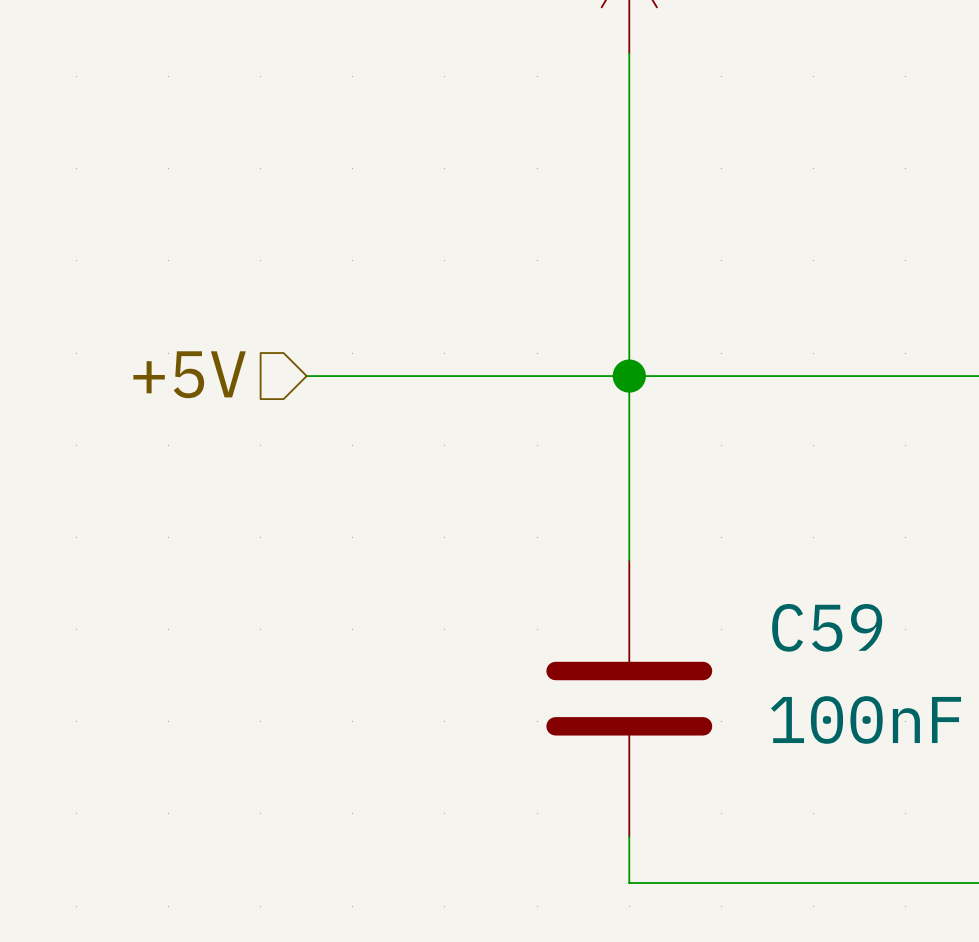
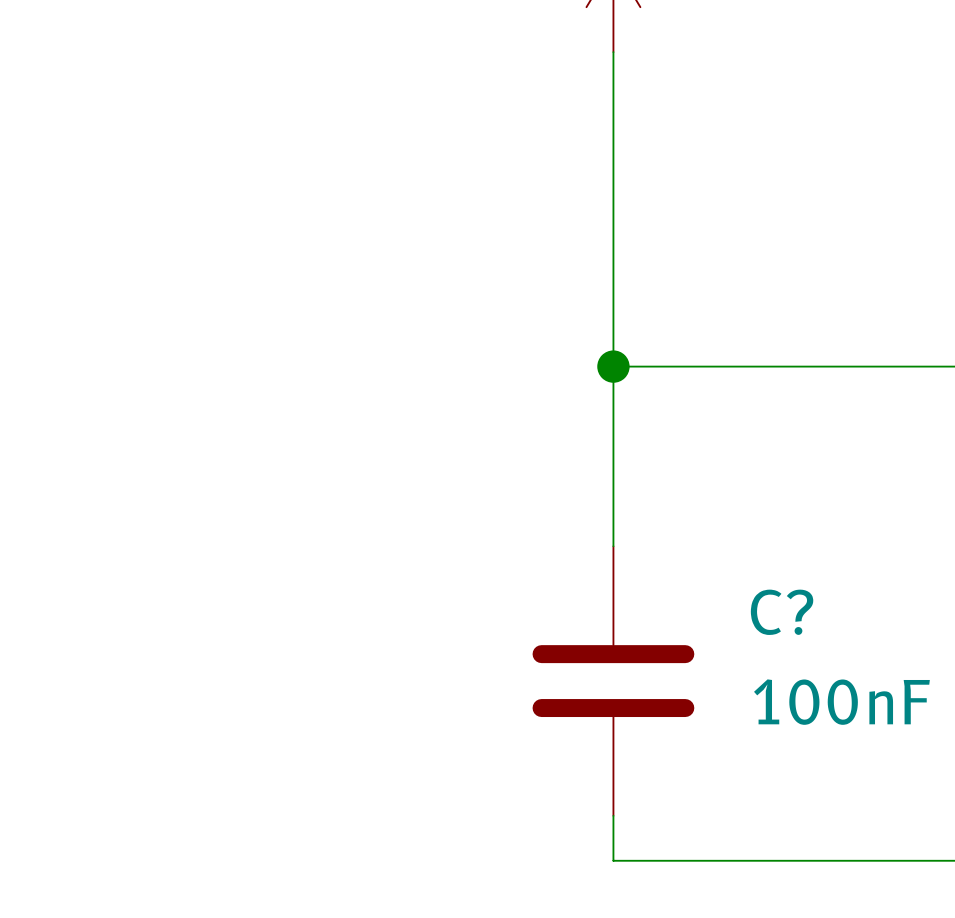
hierarchical label: +5V (189, 374) -> none
wire: (306, 376) (629, 376) -> none
C59 name: C59 (827, 627) -> C? (782, 612)

